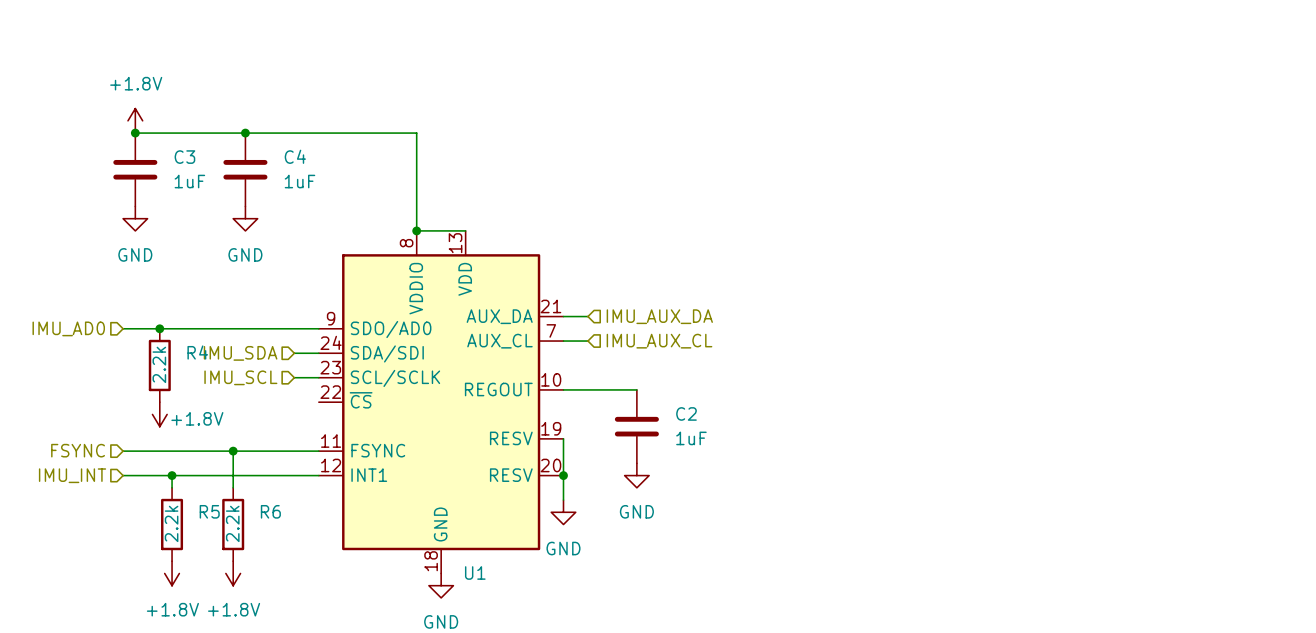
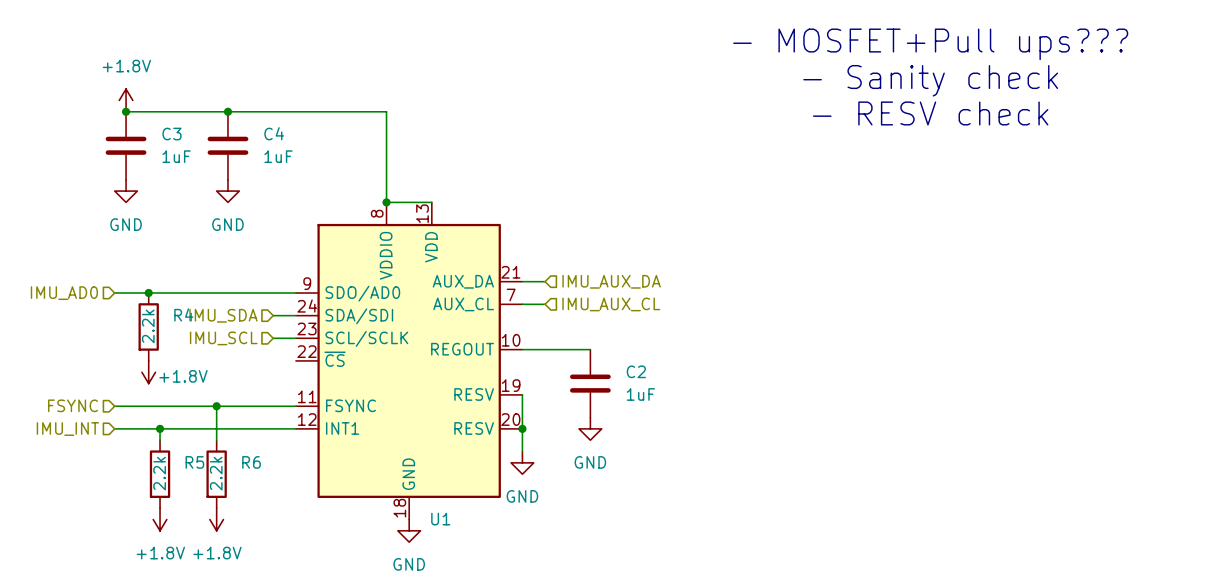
text: none -> - MOSFET+Pull ups??? (930, 44)
text: none -> - Sanity check (930, 80)
text: none -> - RESV check (930, 113)

